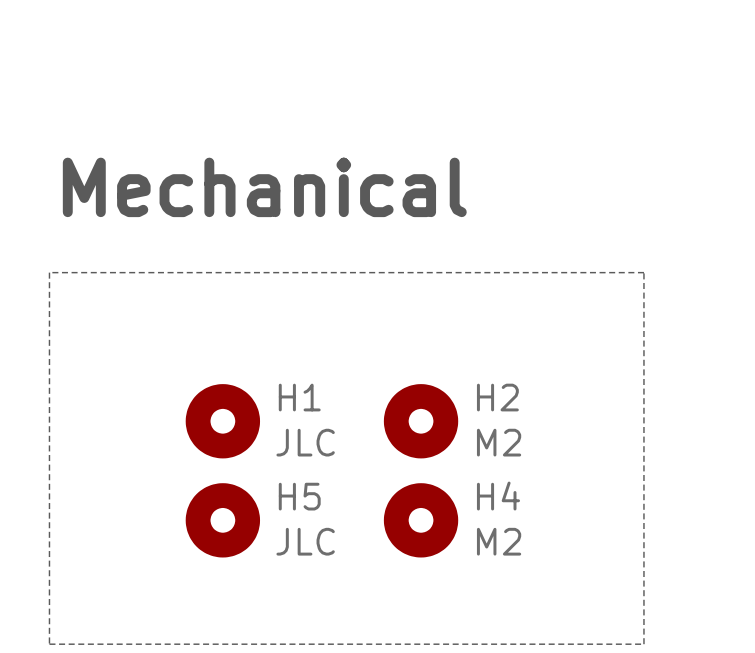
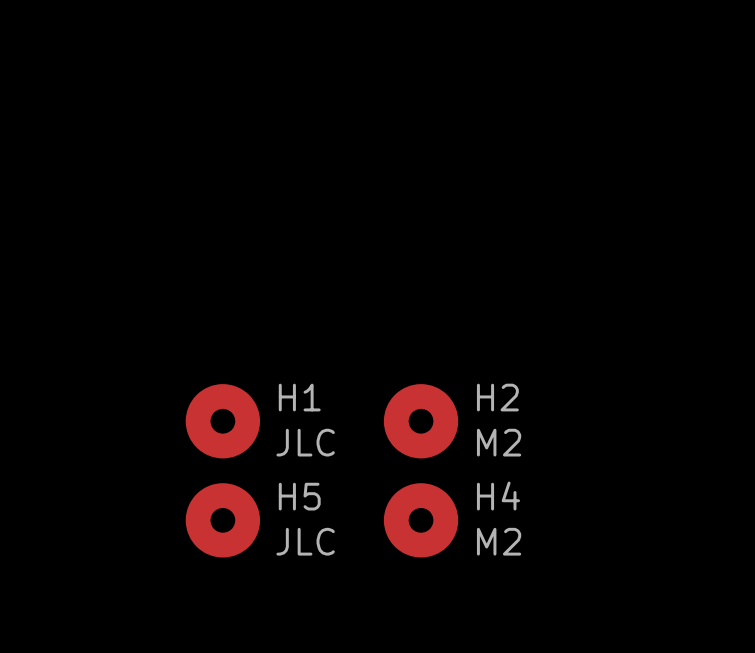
text: Mechanical (264, 187) -> none
line: (49, 272) (49, 644) (643, 644) (643, 272) (49, 272) -> none

